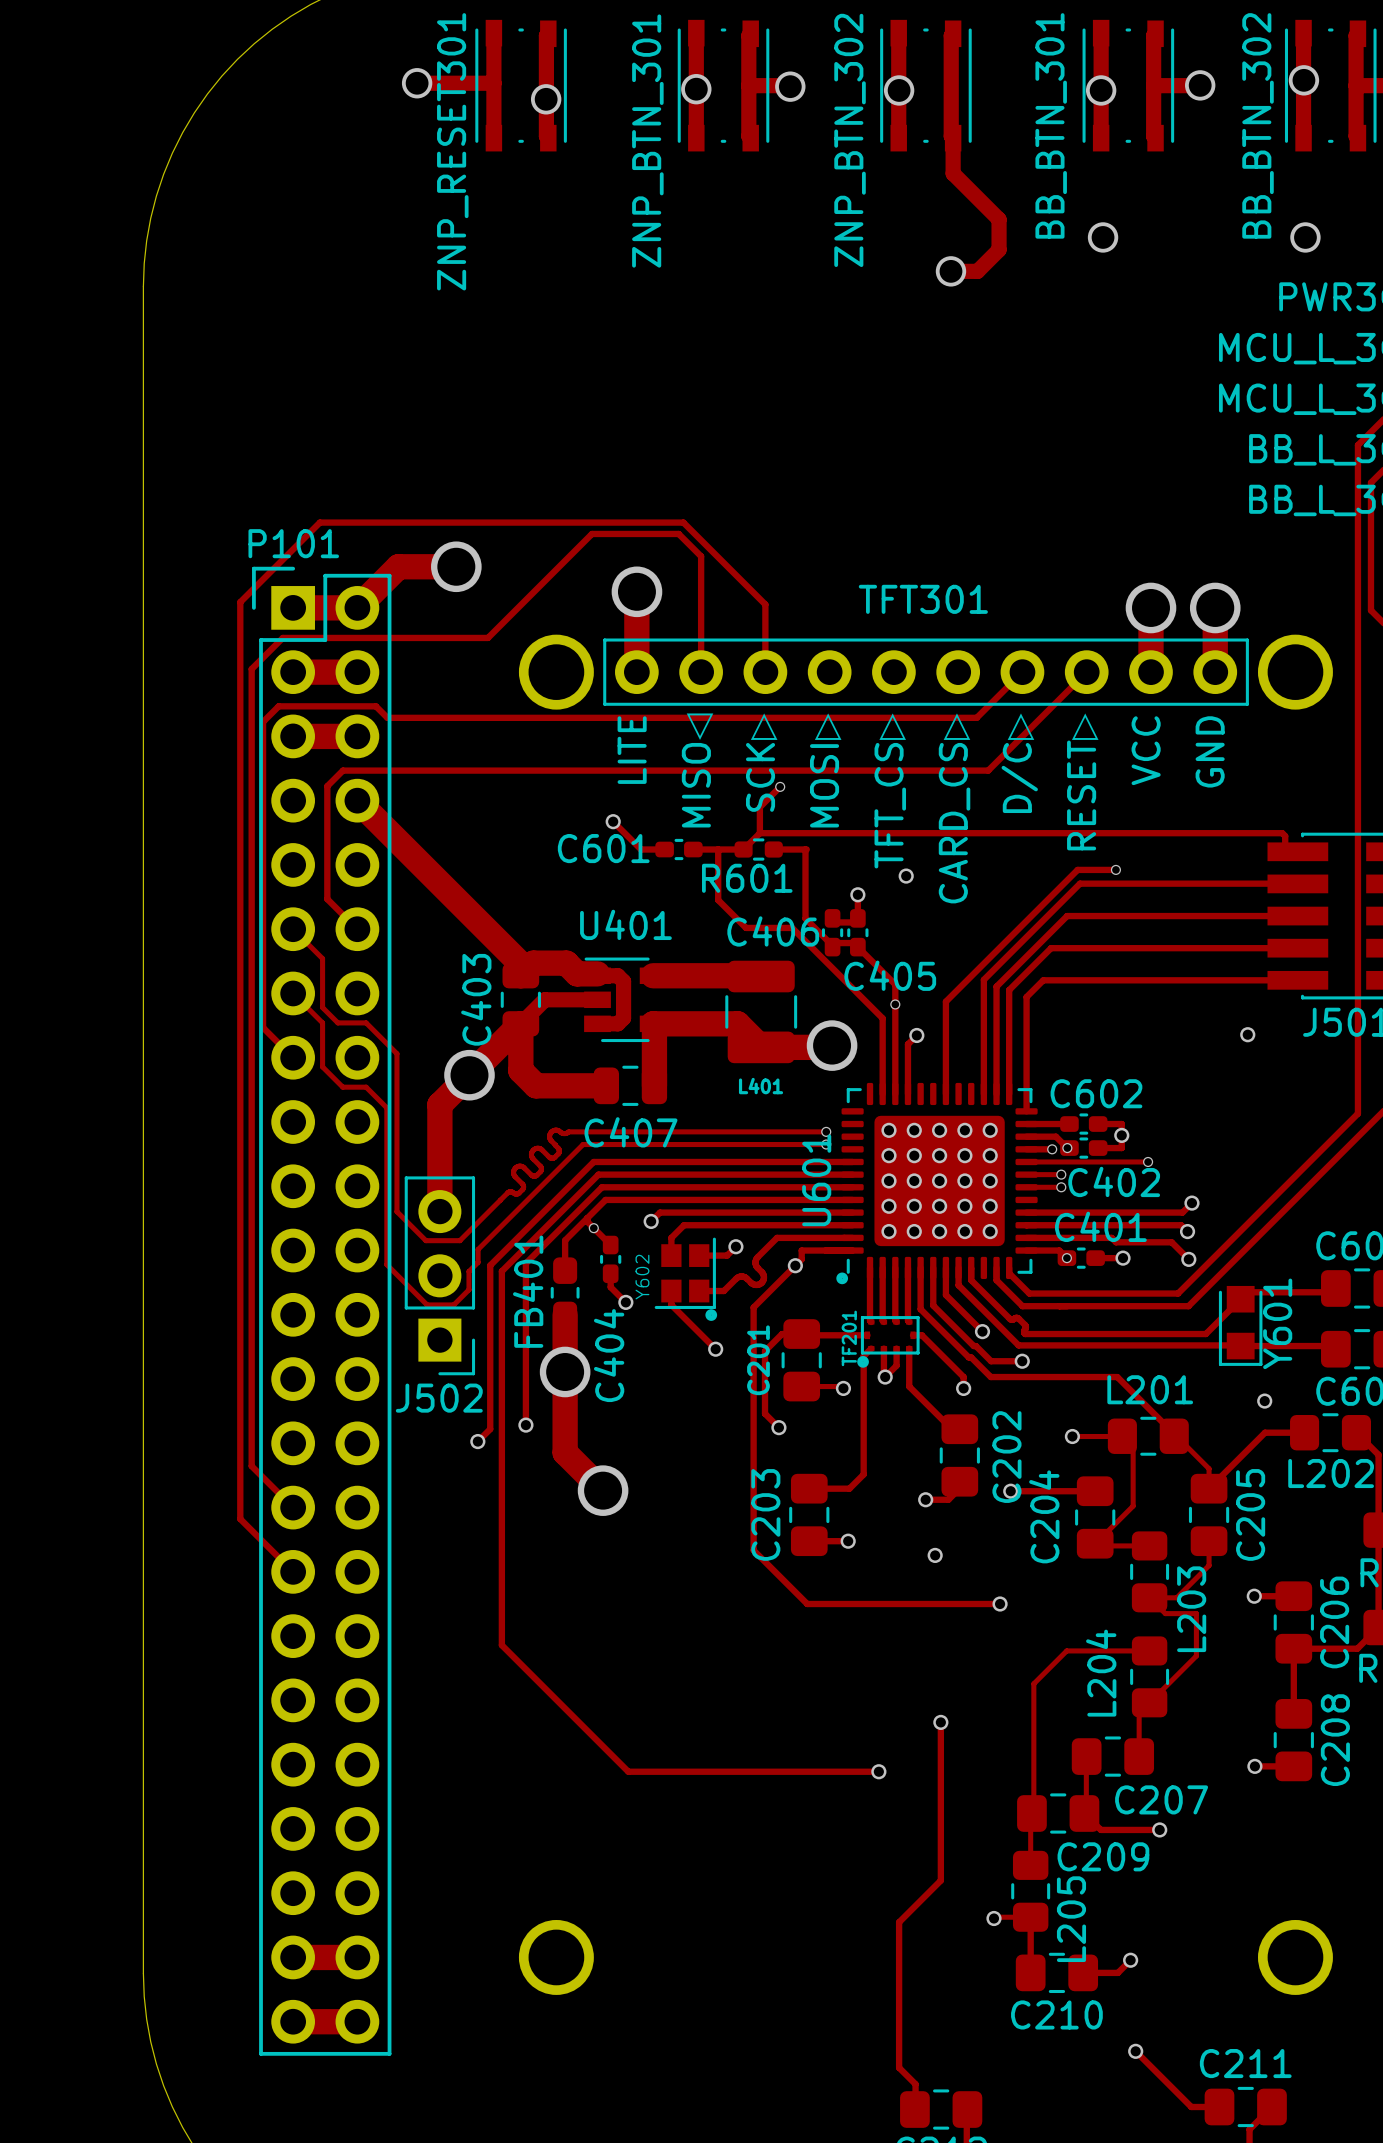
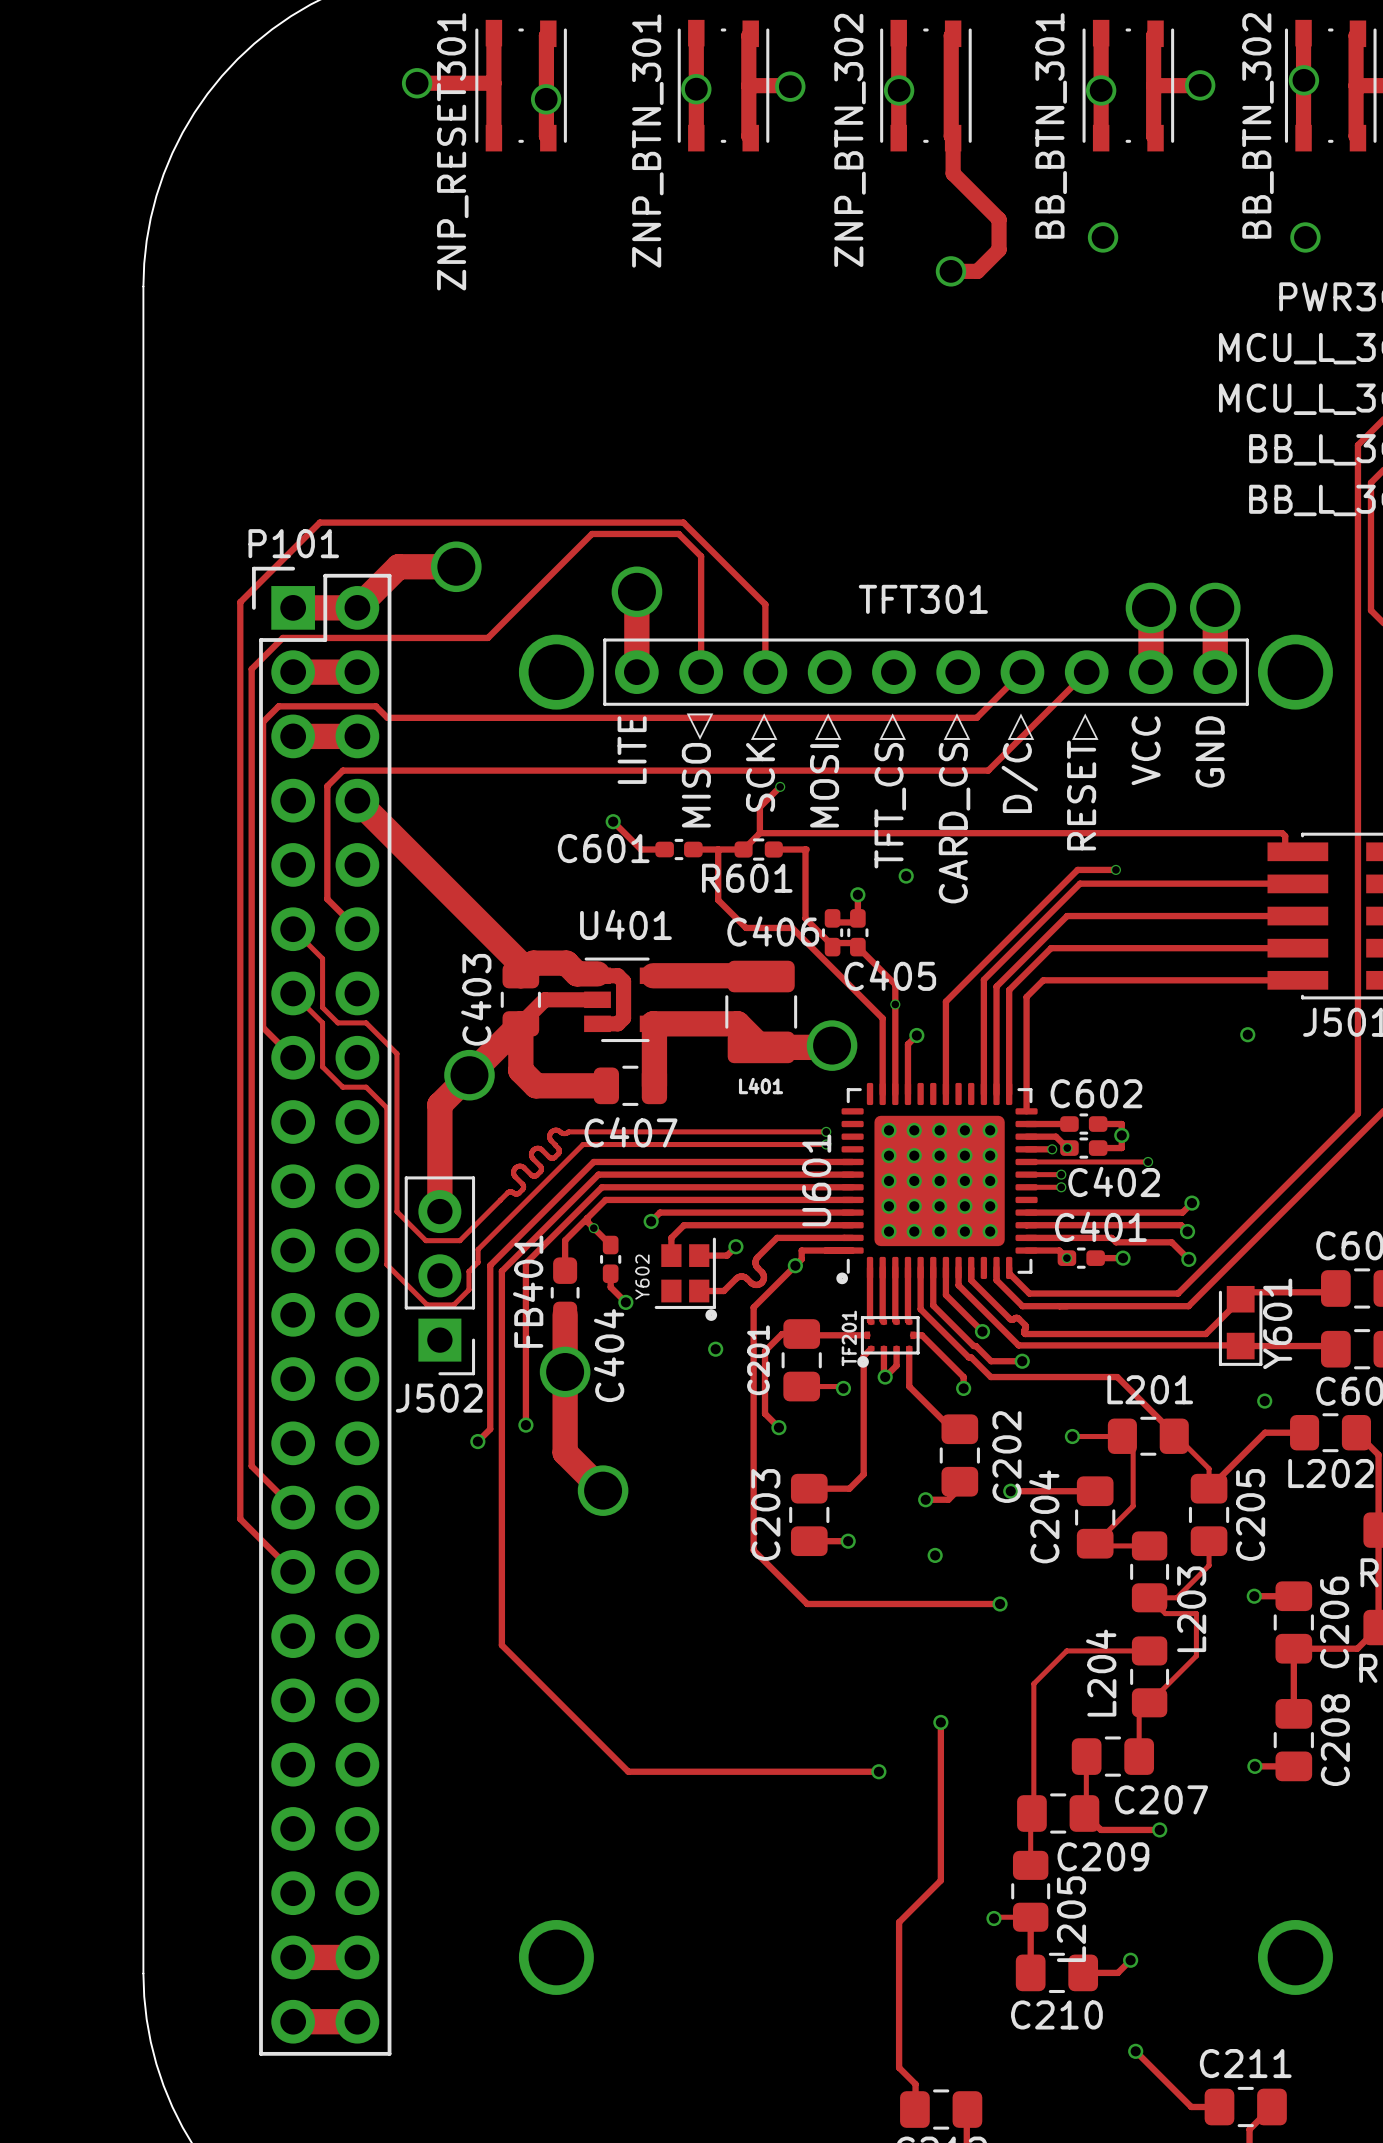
track: (671, 1291) (671, 1304) (715, 1349) -> none

